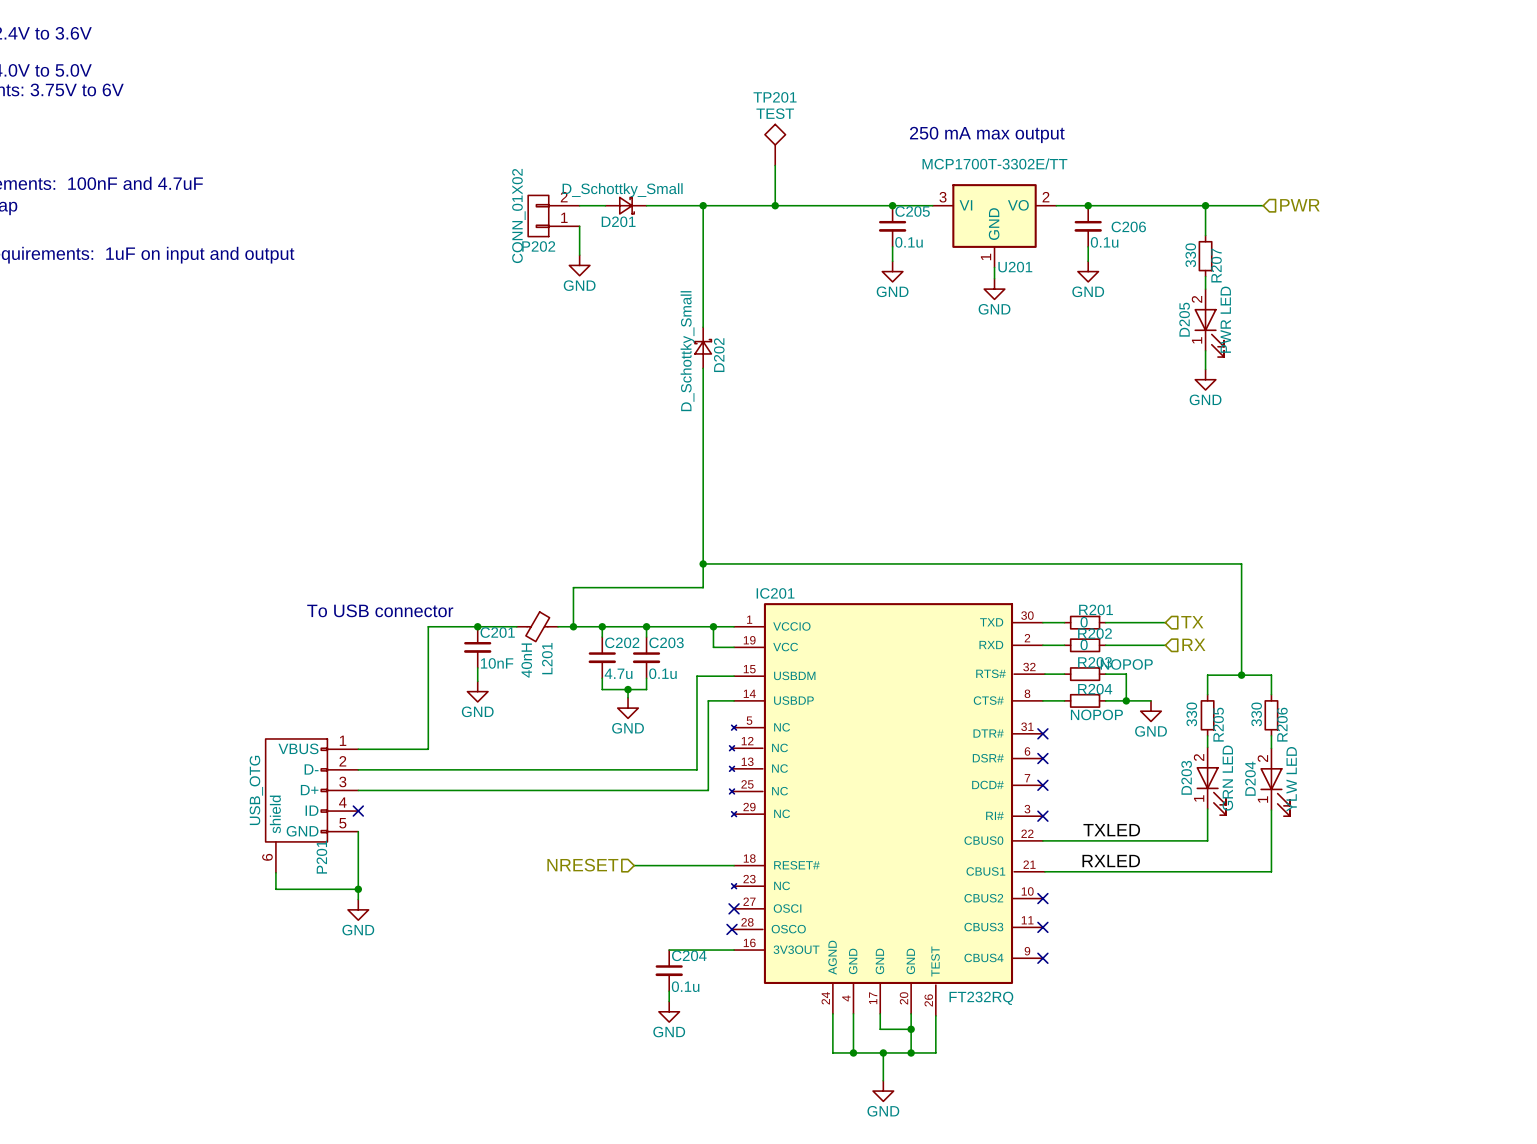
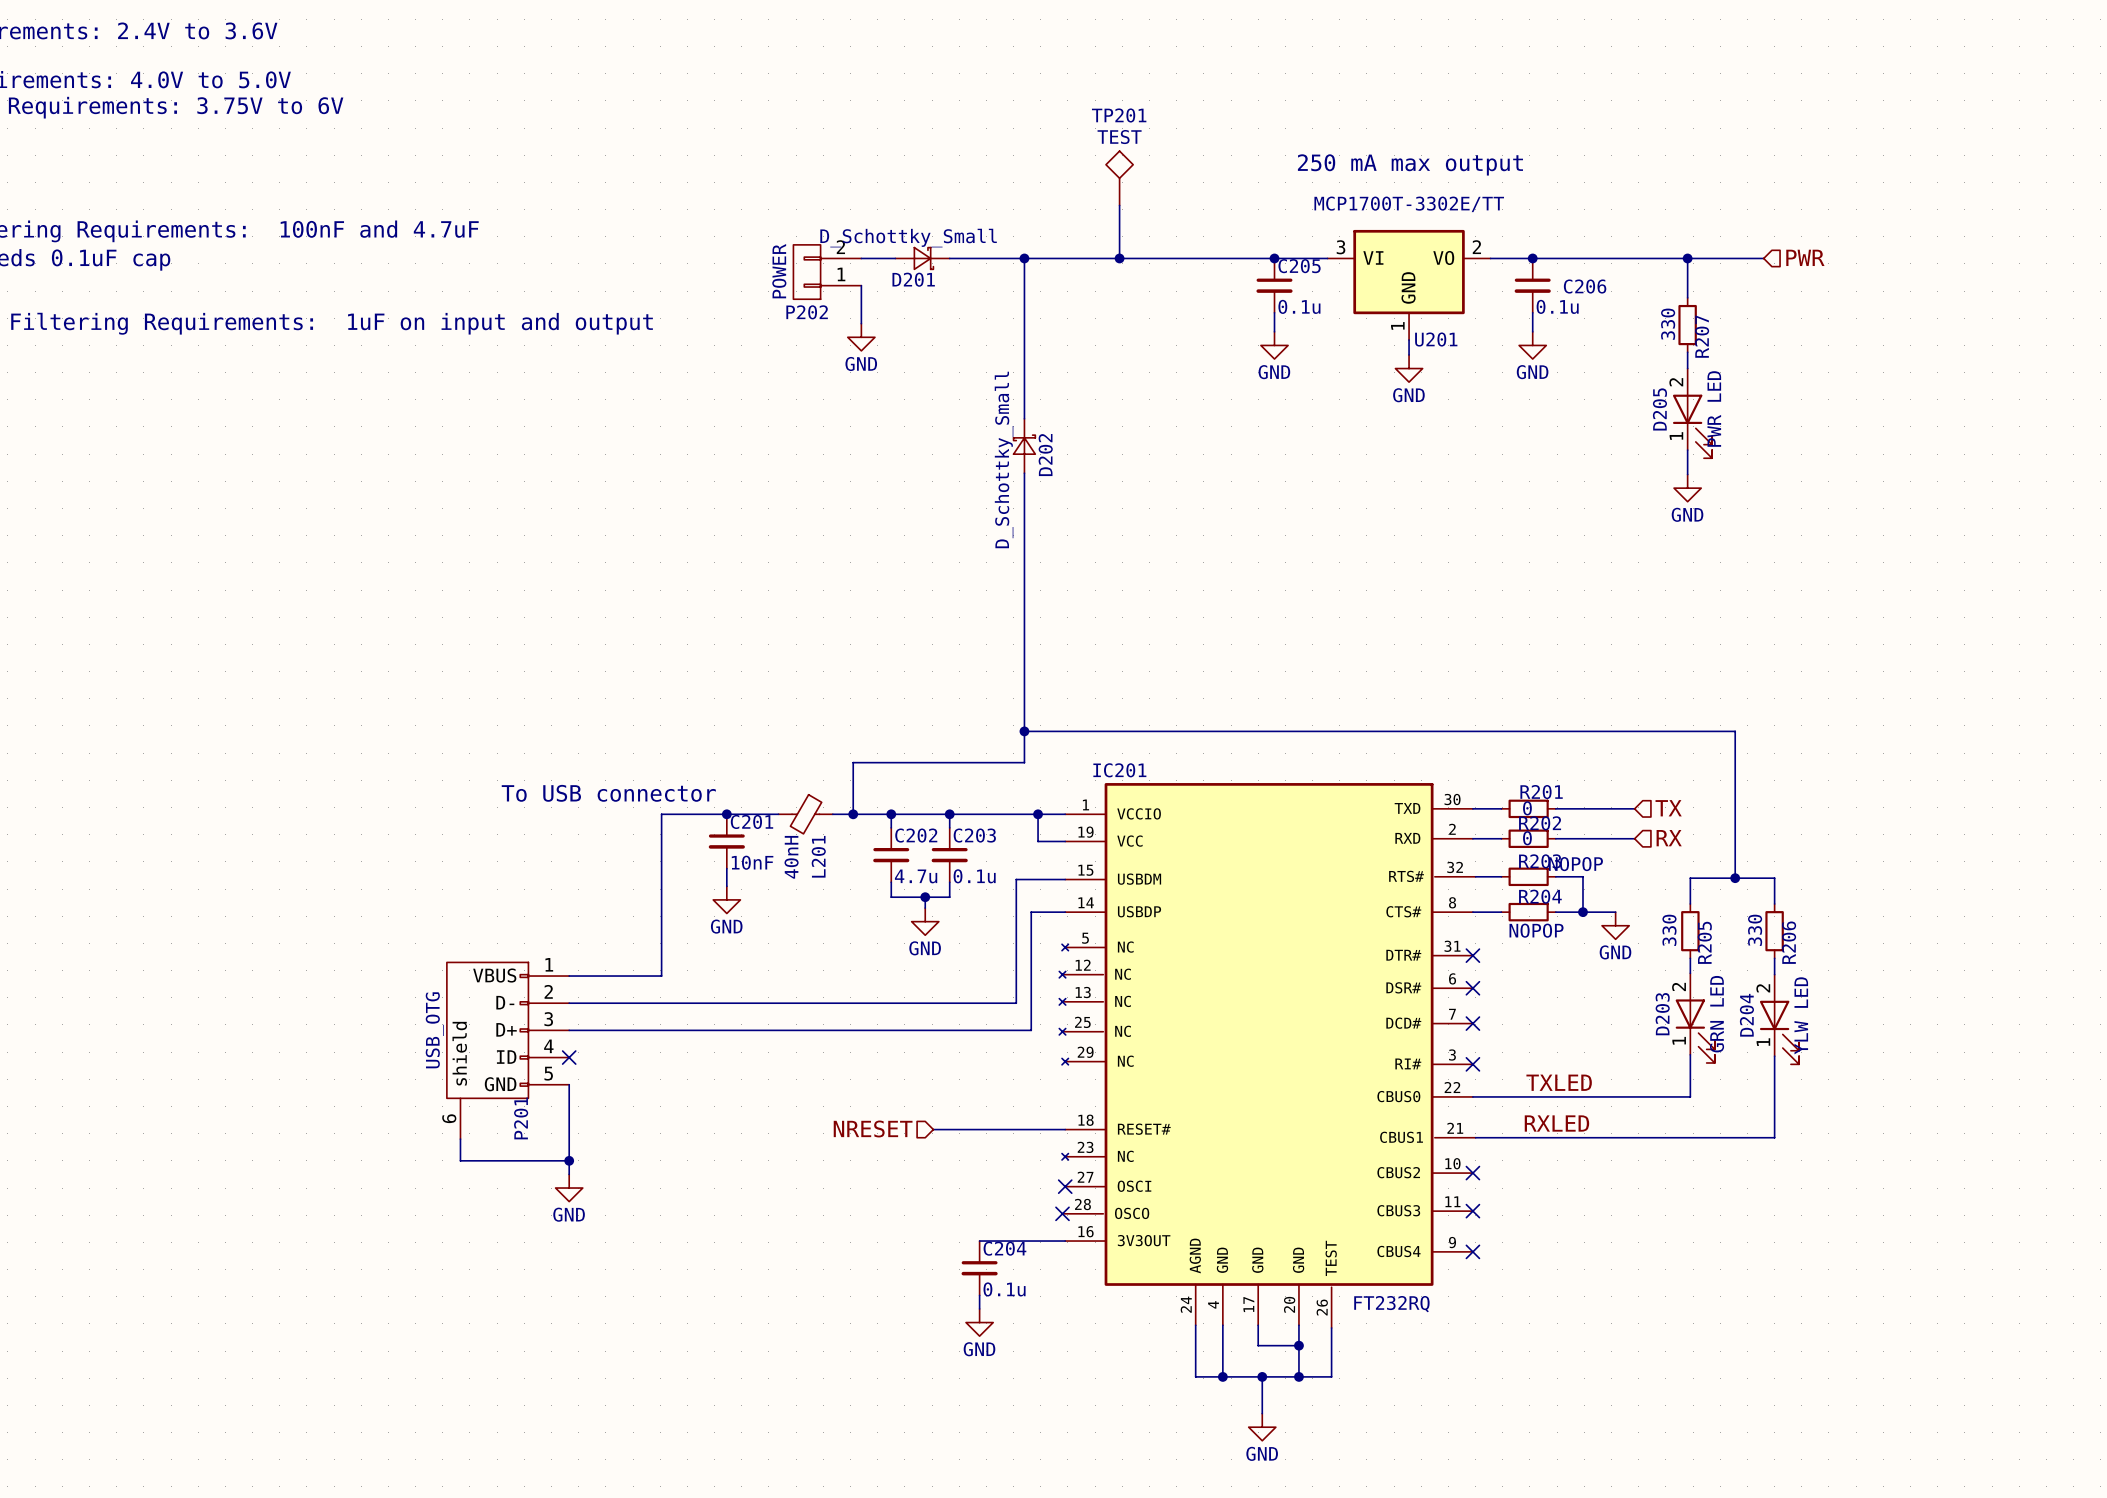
P202 value: CONN_01X02 (518, 216) -> POWER (779, 271)

